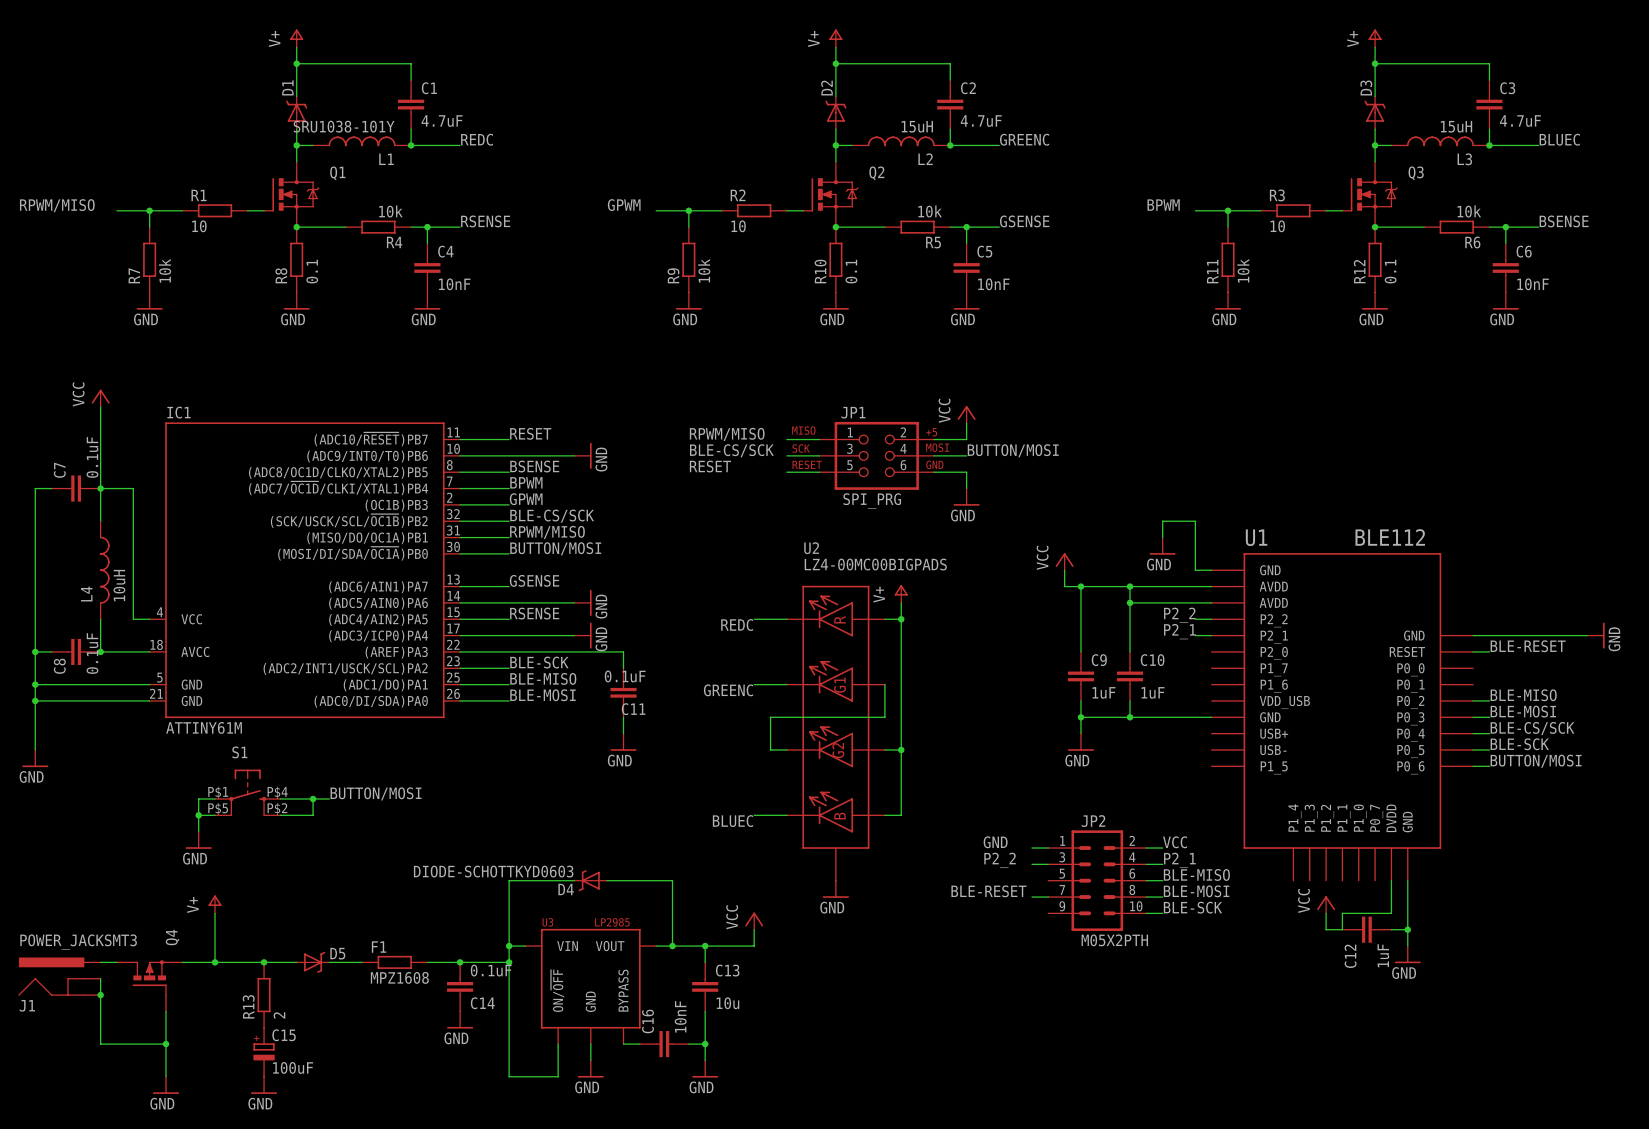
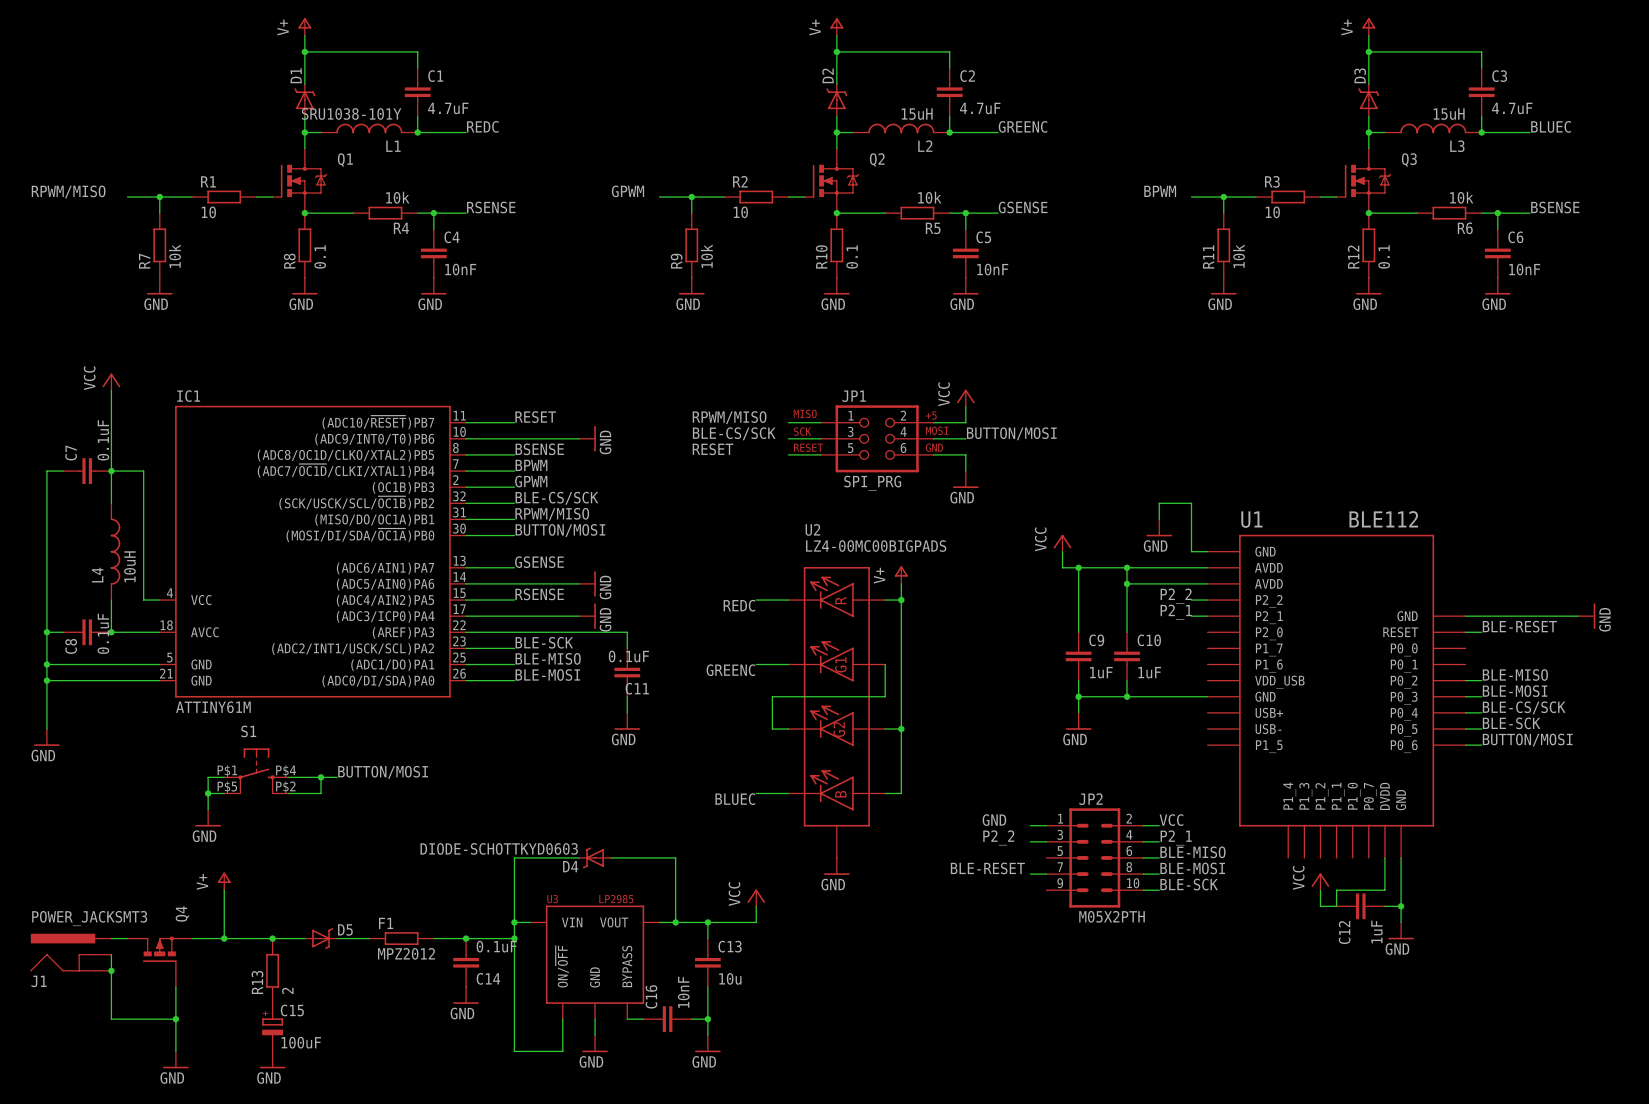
F1 value: MPZ1608 (399, 977) -> MPZ2012 (406, 953)

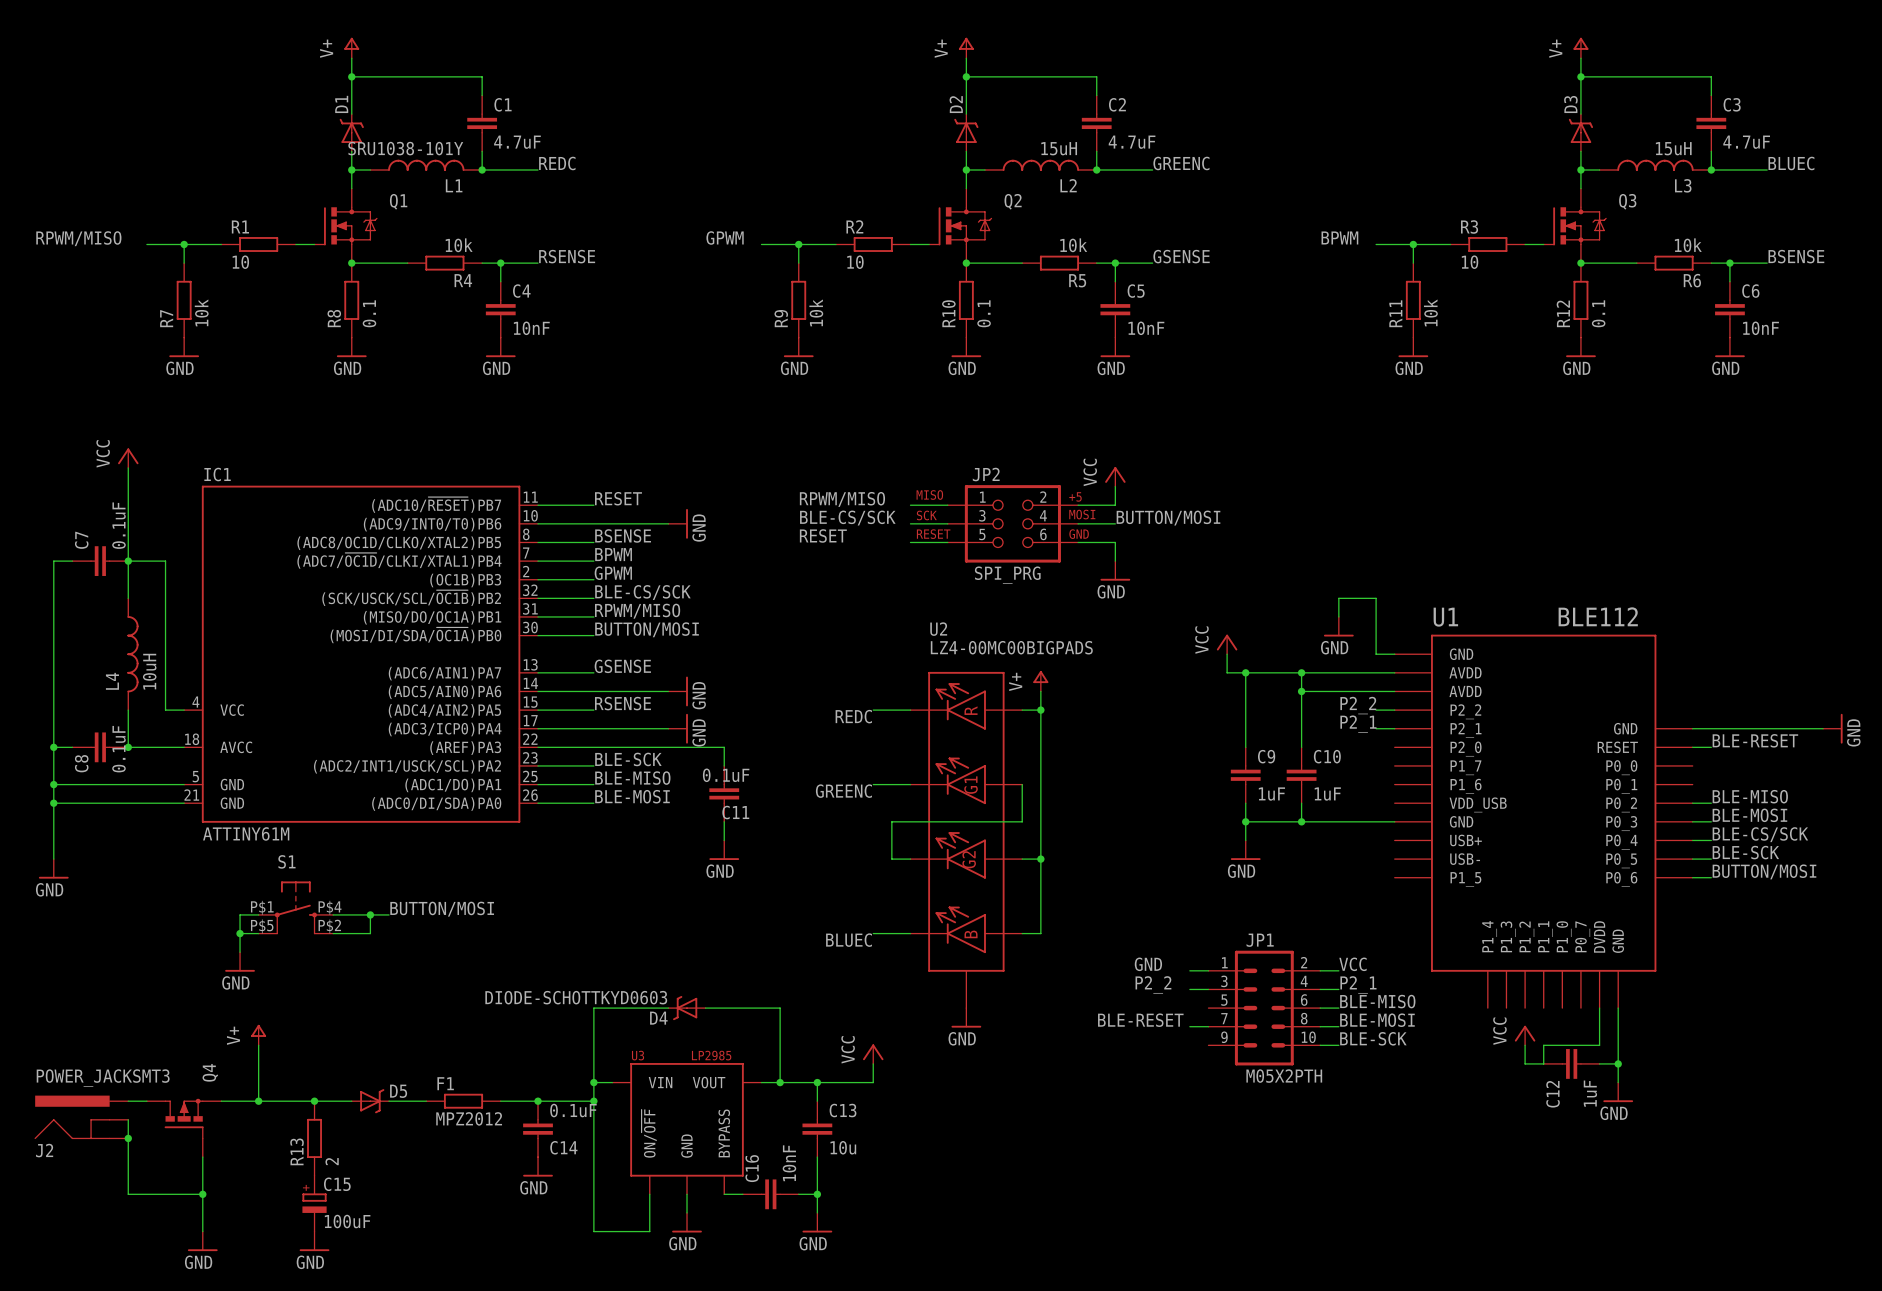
JP1 name: JP1 (854, 396) -> JP2 (986, 474)
JP2 name: JP2 (1091, 799) -> JP1 (1260, 940)
J1 name: J1 (39, 981) -> J2 (44, 1150)

